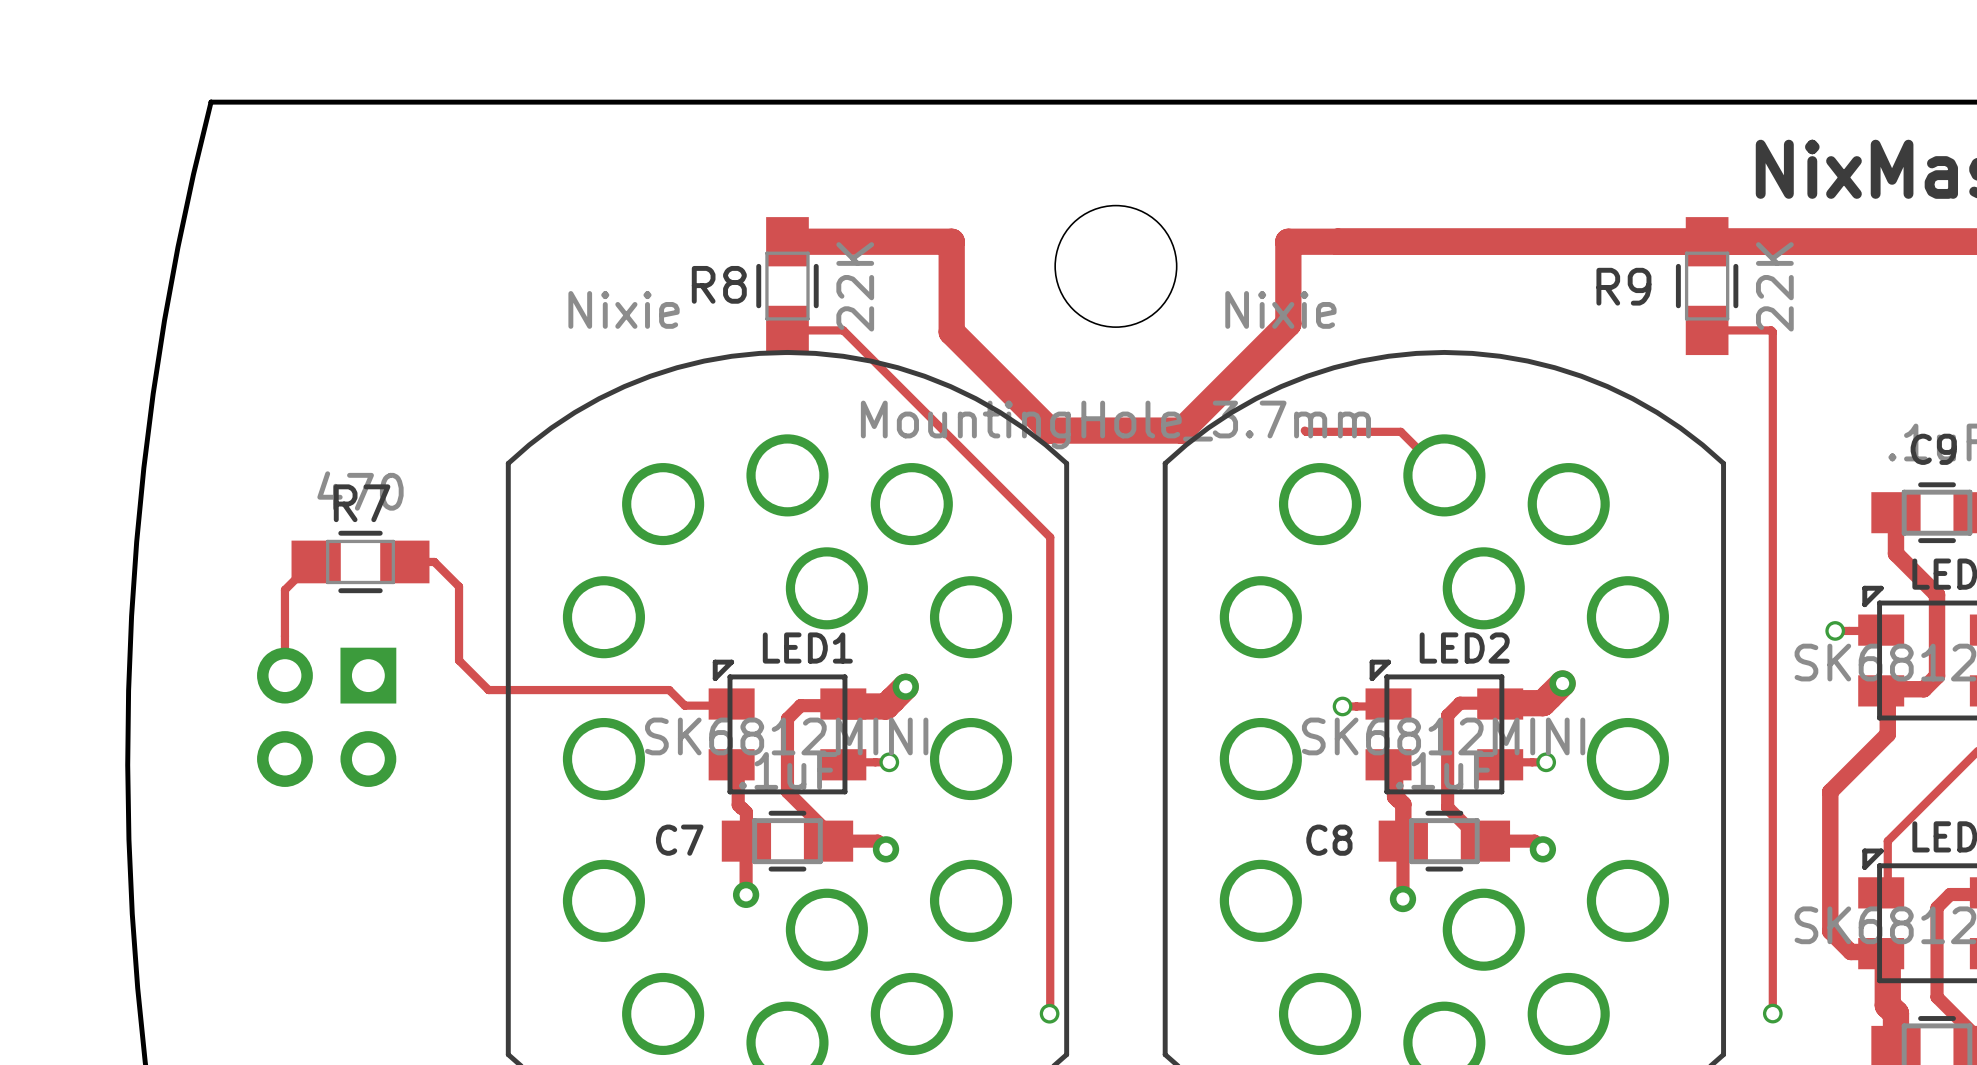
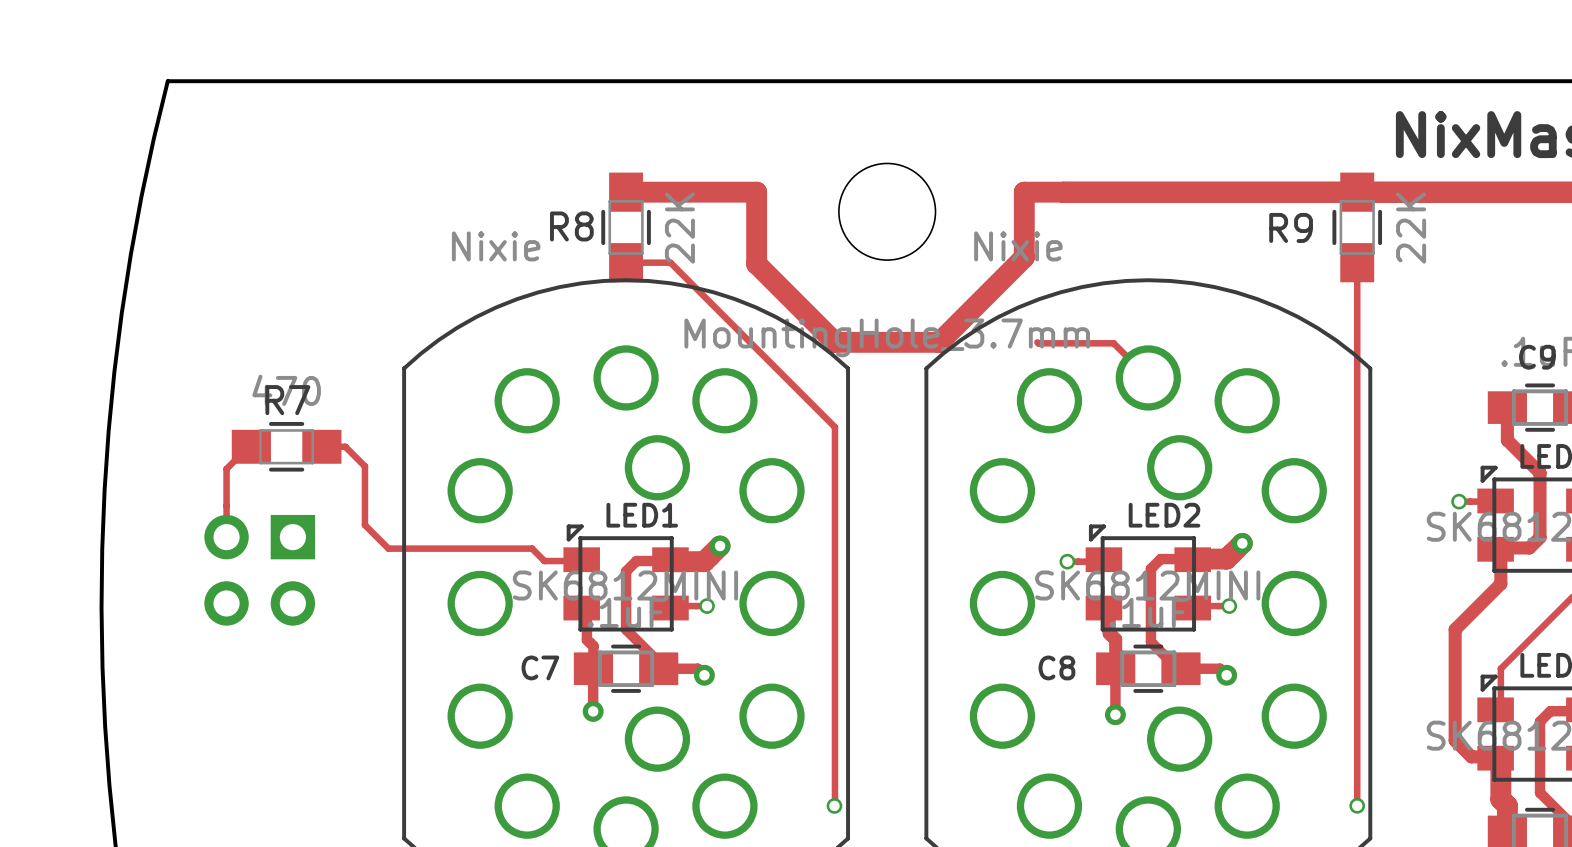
track: (1707, 330) (1771, 330) (1772, 332) (1772, 1013) -> none
track: none -> (1357, 263) (1357, 799)
via position: (1772, 1013) -> (1357, 805)

